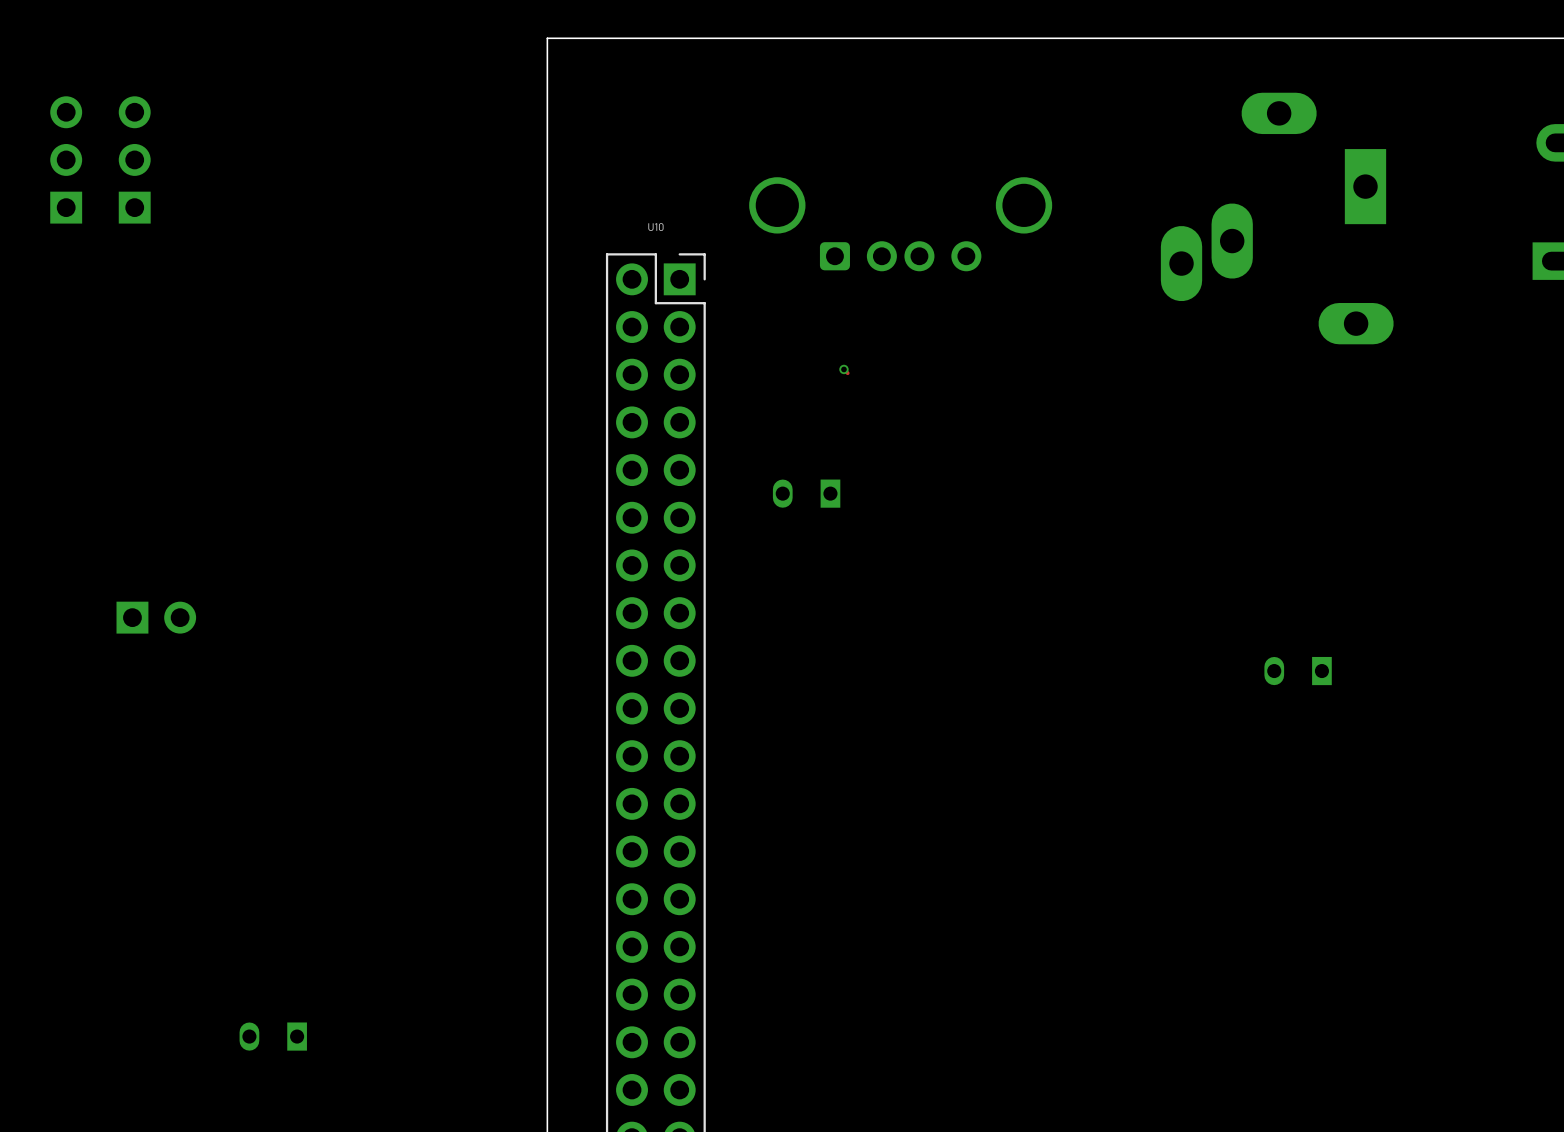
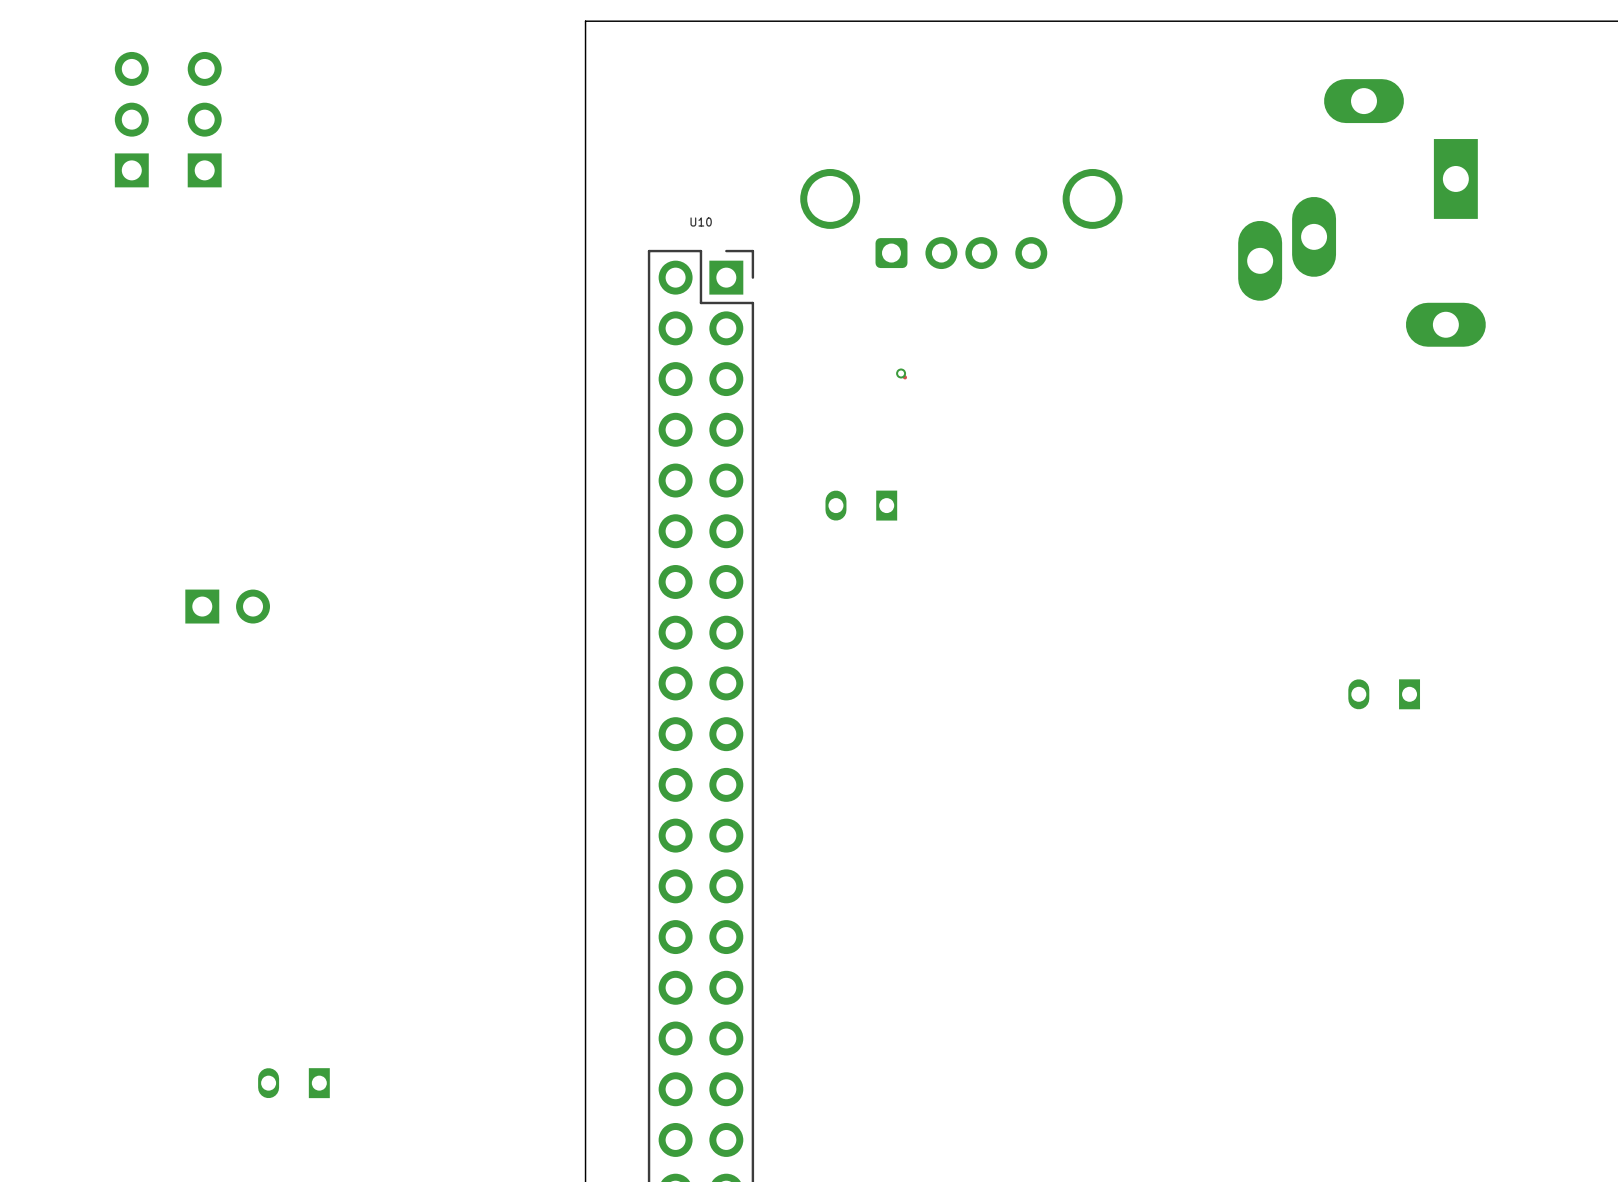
part: none -> (131, 119)
part: none -> (204, 119)
part: (66, 159) -> none
part: (134, 159) -> none
part position: (156, 617) -> (227, 606)

